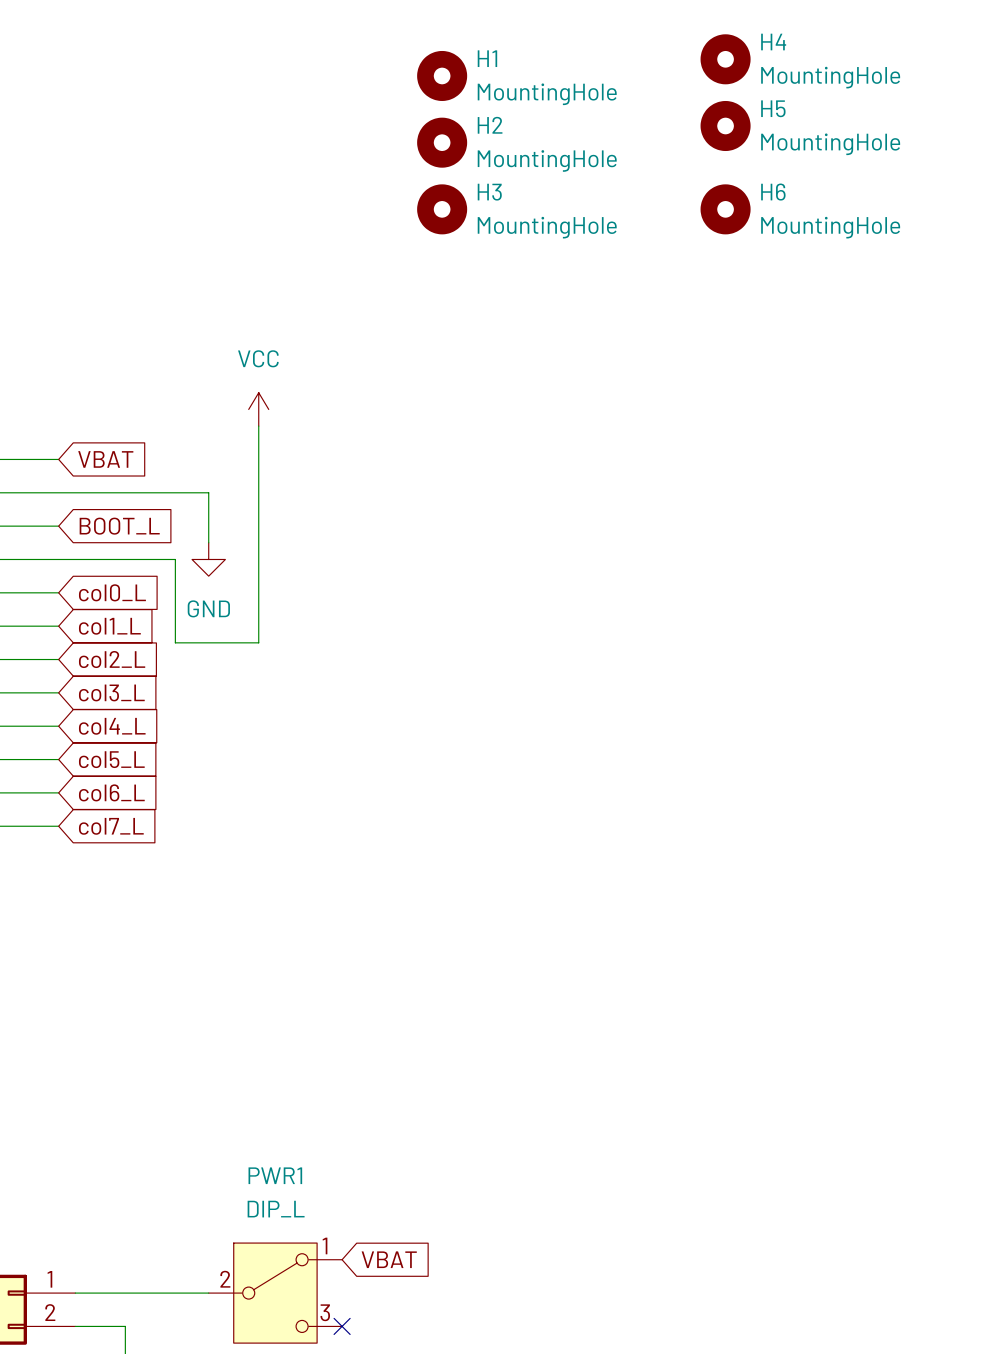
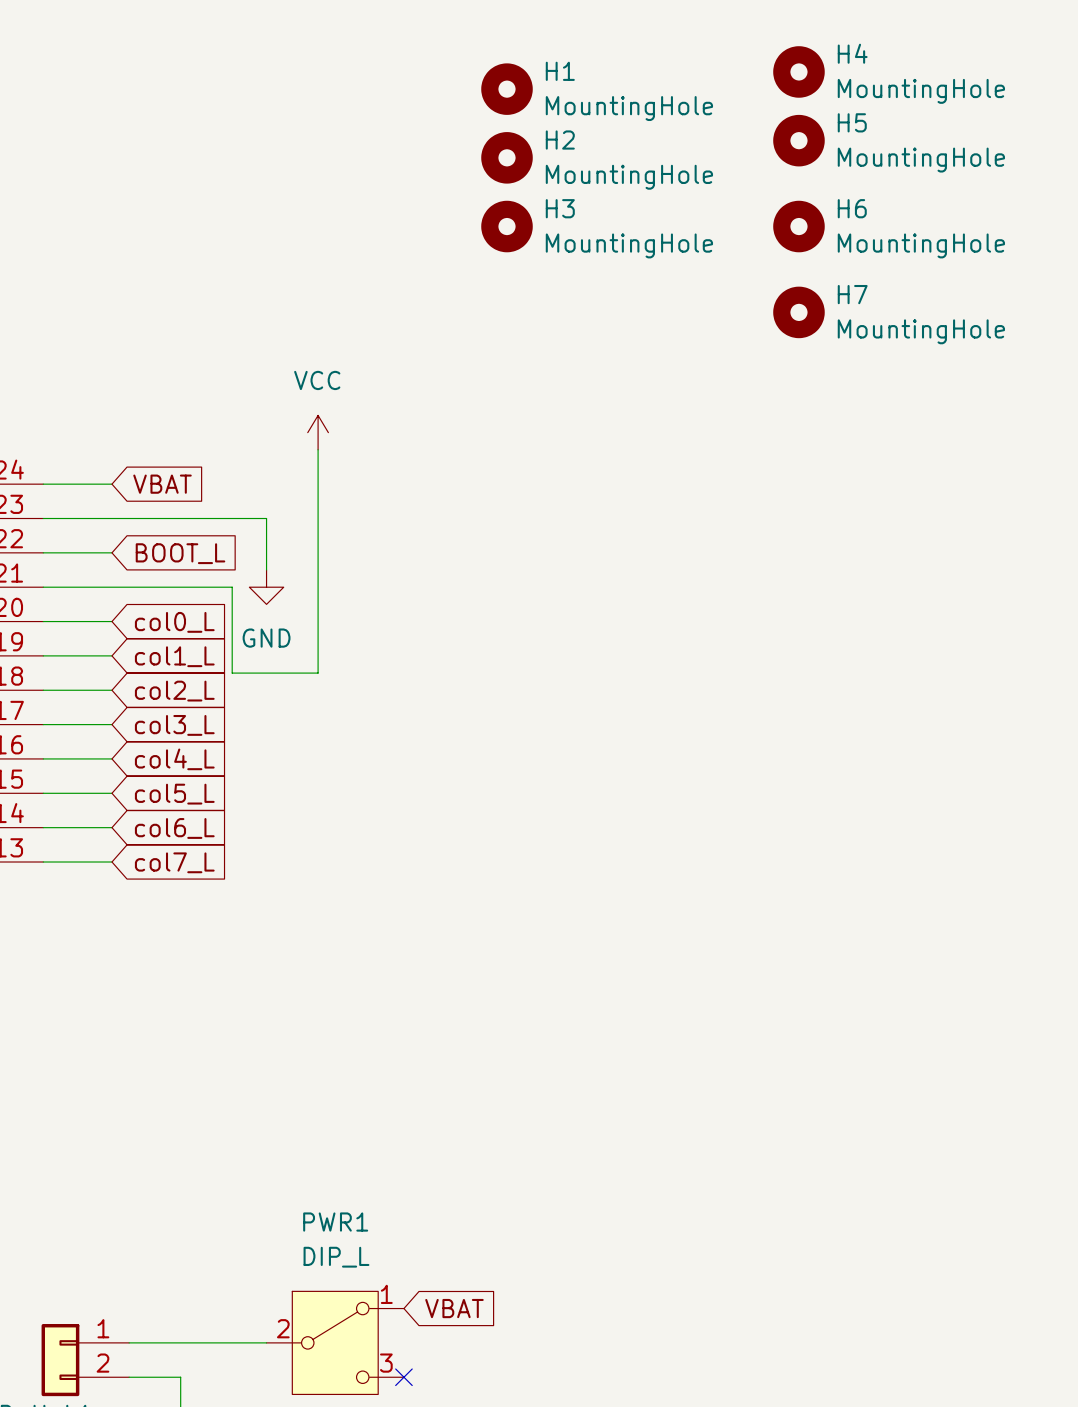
H7: none -> MountingHole (798, 312)

